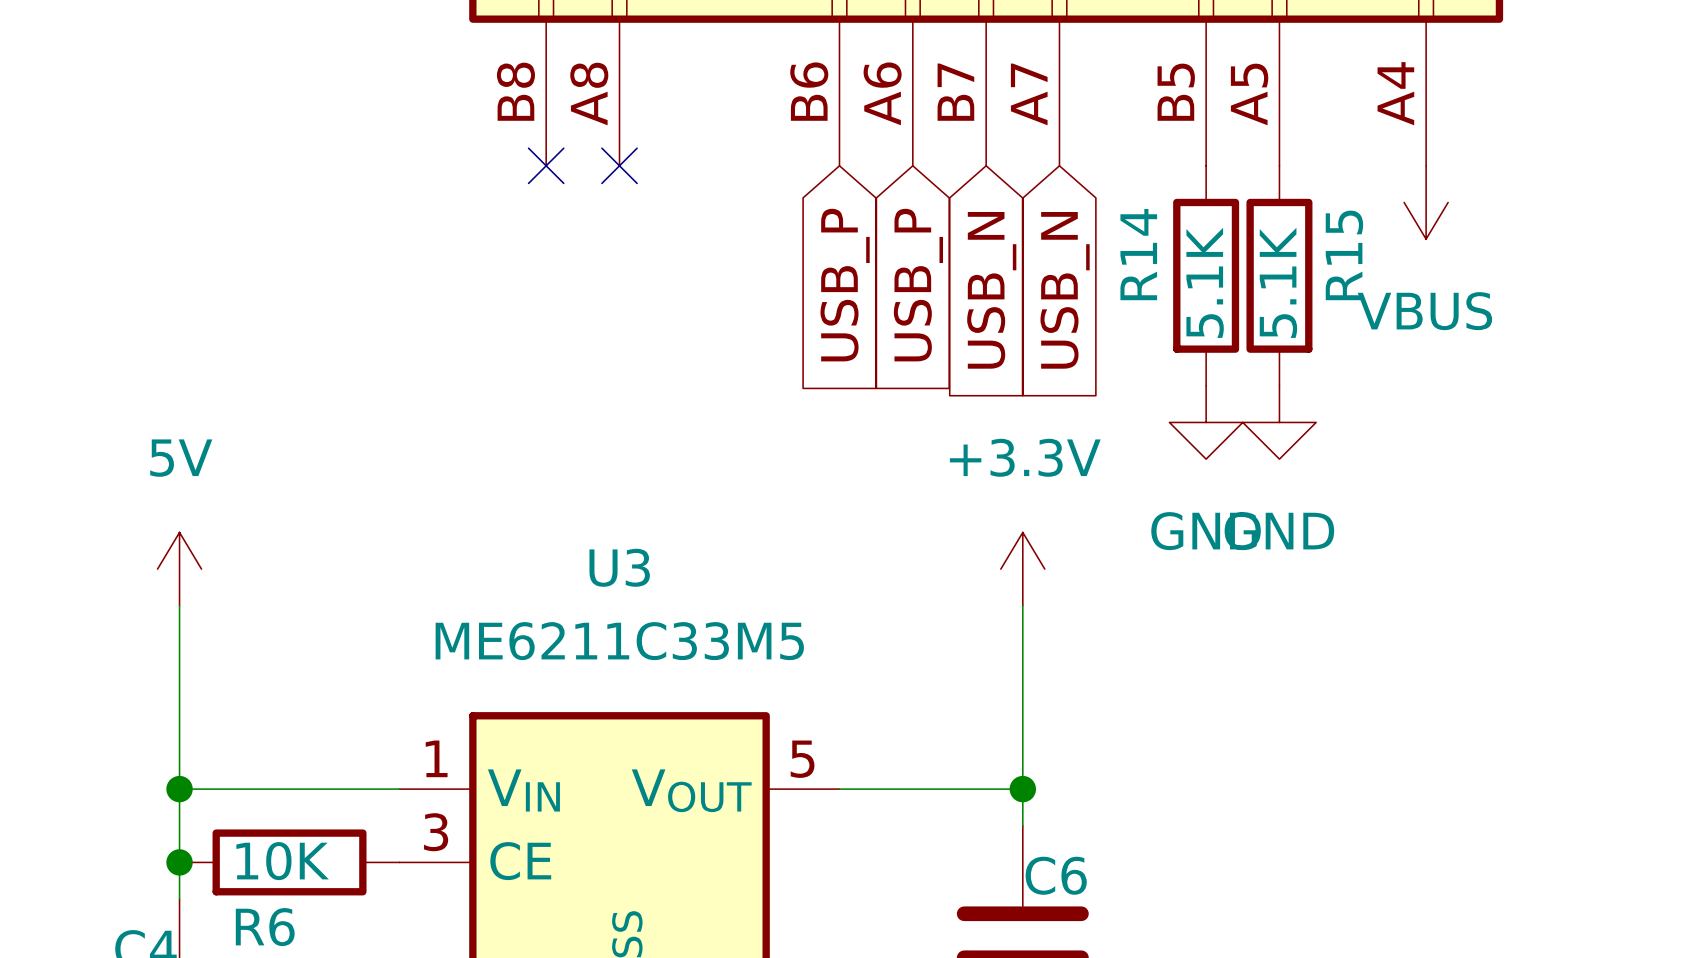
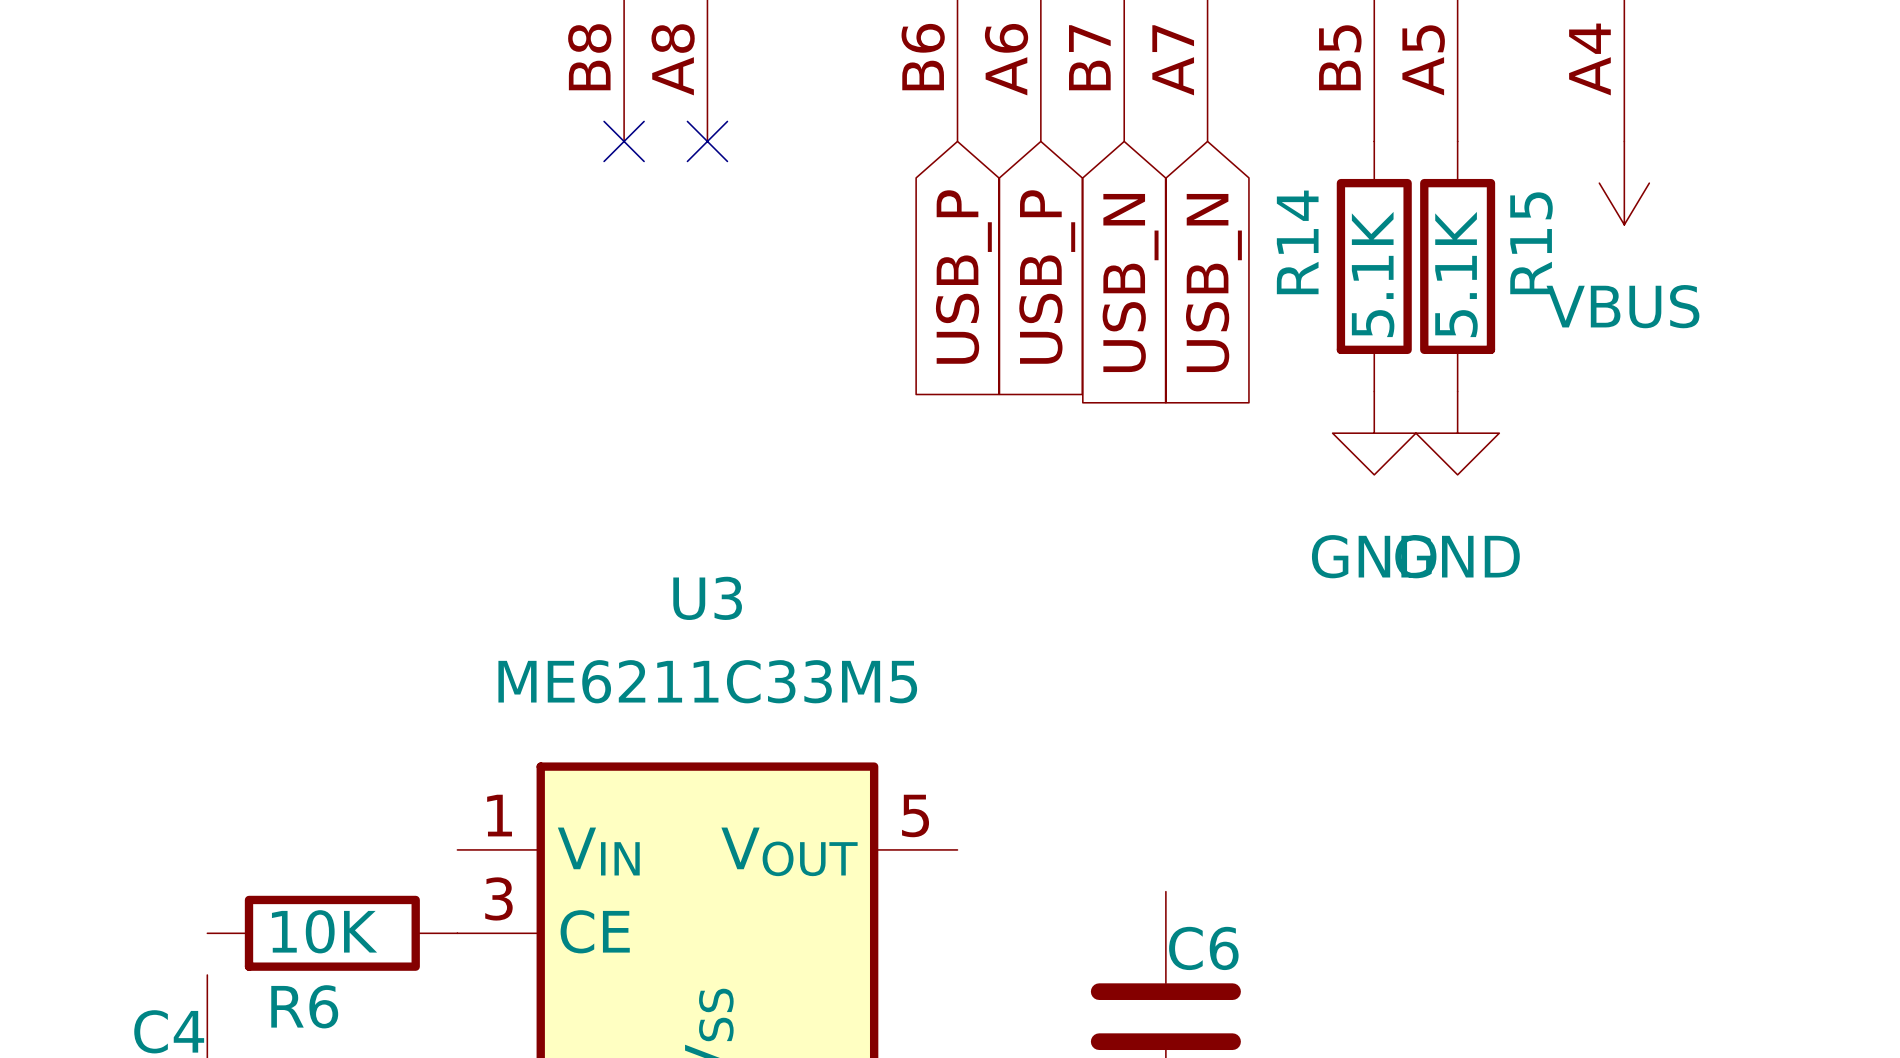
power symbol: 5V (179, 569) -> none
power symbol: +3.3V (1022, 569) -> none
wire: (179, 605) (179, 899) -> none
wire: (1022, 605) (1022, 825) -> none
wire: (179, 789) (399, 789) -> none
junction: (179, 789) -> none
wire: (839, 789) (1022, 789) -> none
junction: (1022, 789) -> none
junction: (179, 862) -> none

